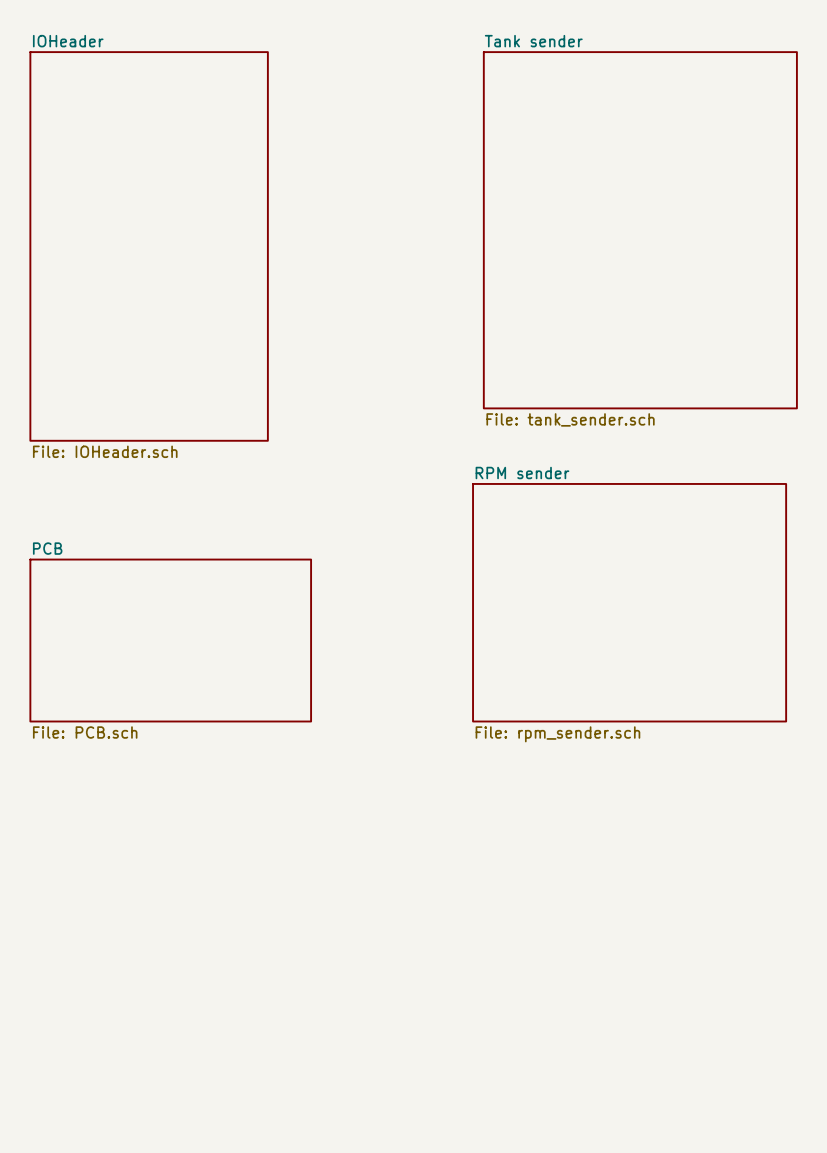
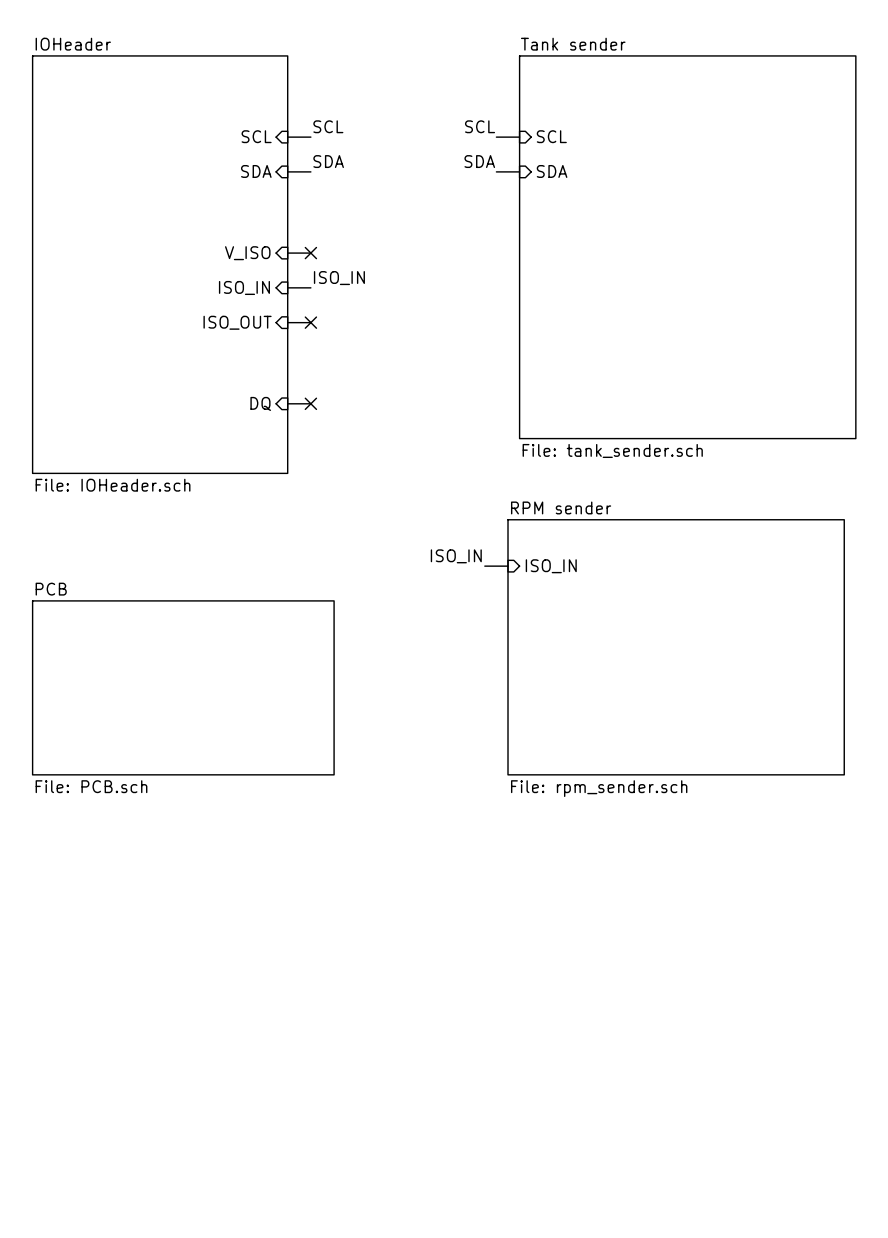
label: none -> SCL (328, 126)
label: none -> SCL (480, 126)
sheet pin: none -> SCL (256, 136)
wire: none -> (287, 137) (310, 137)
wire: none -> (496, 137) (519, 137)
sheet pin: none -> SCL (551, 136)
label: none -> SDA (328, 161)
label: none -> SDA (479, 161)
sheet pin: none -> SDA (256, 171)
sheet pin: none -> SDA (552, 171)
wire: none -> (287, 171) (310, 171)
wire: none -> (496, 171) (519, 171)
sheet pin: none -> V_ISO (247, 253)
wire: none -> (287, 253) (310, 253)
no-connect mark: none -> (310, 253)
label: none -> ISO_IN (339, 278)
sheet pin: none -> ISO_IN (244, 287)
wire: none -> (287, 287) (310, 287)
sheet pin: none -> ISO_OUT (237, 322)
wire: none -> (287, 322) (310, 322)
no-connect mark: none -> (310, 322)
sheet pin: none -> DQ (260, 403)
wire: none -> (287, 403) (310, 403)
no-connect mark: none -> (310, 403)
label: none -> ISO_IN (456, 556)
wire: none -> (484, 566) (508, 566)
sheet pin: none -> ISO_IN (551, 566)

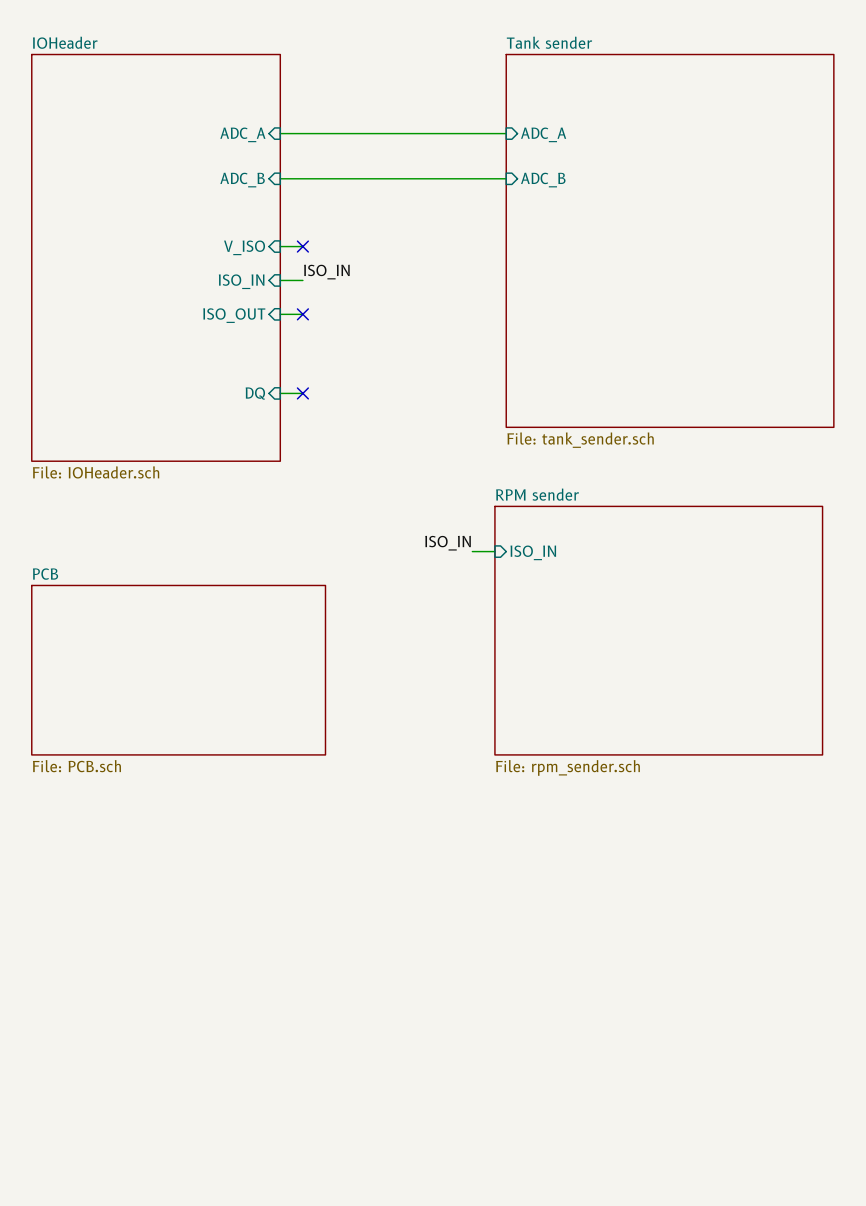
label: SCL (328, 126) -> none
label: SCL (480, 126) -> none
sheet pin: SCL (256, 136) -> ADC_A (242, 134)
sheet pin: SCL (551, 136) -> ADC_A (543, 134)
wire: none -> (302, 133) (483, 133)
label: SDA (328, 161) -> none
label: SDA (479, 161) -> none
sheet pin: SDA (256, 171) -> none
wire: (287, 171) (310, 171) -> none
wire: (496, 171) (519, 171) -> none
sheet pin: SDA (552, 171) -> none
sheet pin: none -> ADC_B (242, 180)
wire: none -> (280, 178) (506, 178)
sheet pin: none -> ADC_B (543, 180)

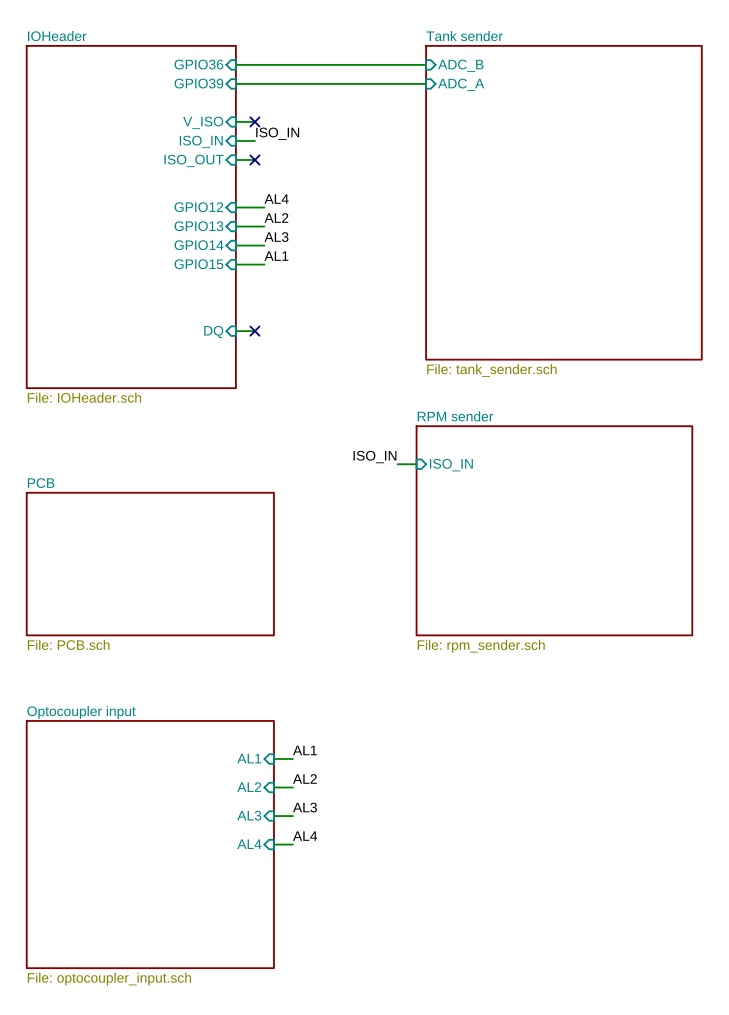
sheet pin: none -> GPIO36 (198, 64)
sheet pin: none -> GPIO39 (198, 83)
wire: (280, 133) (506, 133) -> (235, 83) (426, 83)
sheet pin: ADC_A (242, 134) -> none
sheet pin position: ADC_A (543, 134) -> ADC_A (461, 84)
wire: none -> (235, 121) (254, 121)
no-connect mark: none -> (254, 121)
sheet pin: none -> V_ISO (203, 122)
wire: none -> (235, 140) (254, 140)
wire: (280, 178) (506, 178) -> (235, 64) (426, 64)
sheet pin: ADC_B (242, 180) -> none
sheet pin position: ADC_B (543, 180) -> ADC_B (460, 65)
no-connect mark: none -> (254, 159)
sheet pin: none -> ISO_OUT (193, 160)
label: none -> AL4 (276, 199)
wire: none -> (254, 207) (264, 207)
no-connect mark: (302, 246) -> none
sheet pin: V_ISO (244, 247) -> GPIO12 (198, 207)
label: none -> AL2 (276, 217)
sheet pin: none -> GPIO13 (198, 226)
wire: none -> (235, 226) (264, 226)
label position: ISO_IN (326, 272) -> ISO_IN (277, 133)
wire: (280, 280) (302, 280) -> (235, 159) (254, 159)
sheet pin position: ISO_IN (241, 281) -> ISO_IN (201, 141)
label: none -> AL3 (276, 237)
sheet pin: none -> GPIO14 (199, 245)
wire: none -> (235, 245) (264, 245)
label: none -> AL1 (276, 256)
wire: none -> (254, 264) (264, 264)
no-connect mark: (302, 314) -> none
sheet pin: ISO_OUT (234, 315) -> GPIO15 (198, 264)
label: none -> AL1 (304, 750)
sheet pin: none -> AL1 (249, 758)
wire: none -> (273, 758) (292, 758)
label: none -> AL2 (304, 778)
sheet pin: none -> AL2 (249, 787)
wire: none -> (273, 787) (292, 787)
label: none -> AL3 (304, 807)
sheet pin: none -> AL3 (249, 815)
wire: none -> (273, 816) (292, 816)
label: none -> AL4 (305, 836)
sheet Optocoupler input: none -> File: optocoupler_input.sch (150, 844)
sheet pin: none -> AL4 (249, 844)
wire: none -> (273, 844) (292, 844)

